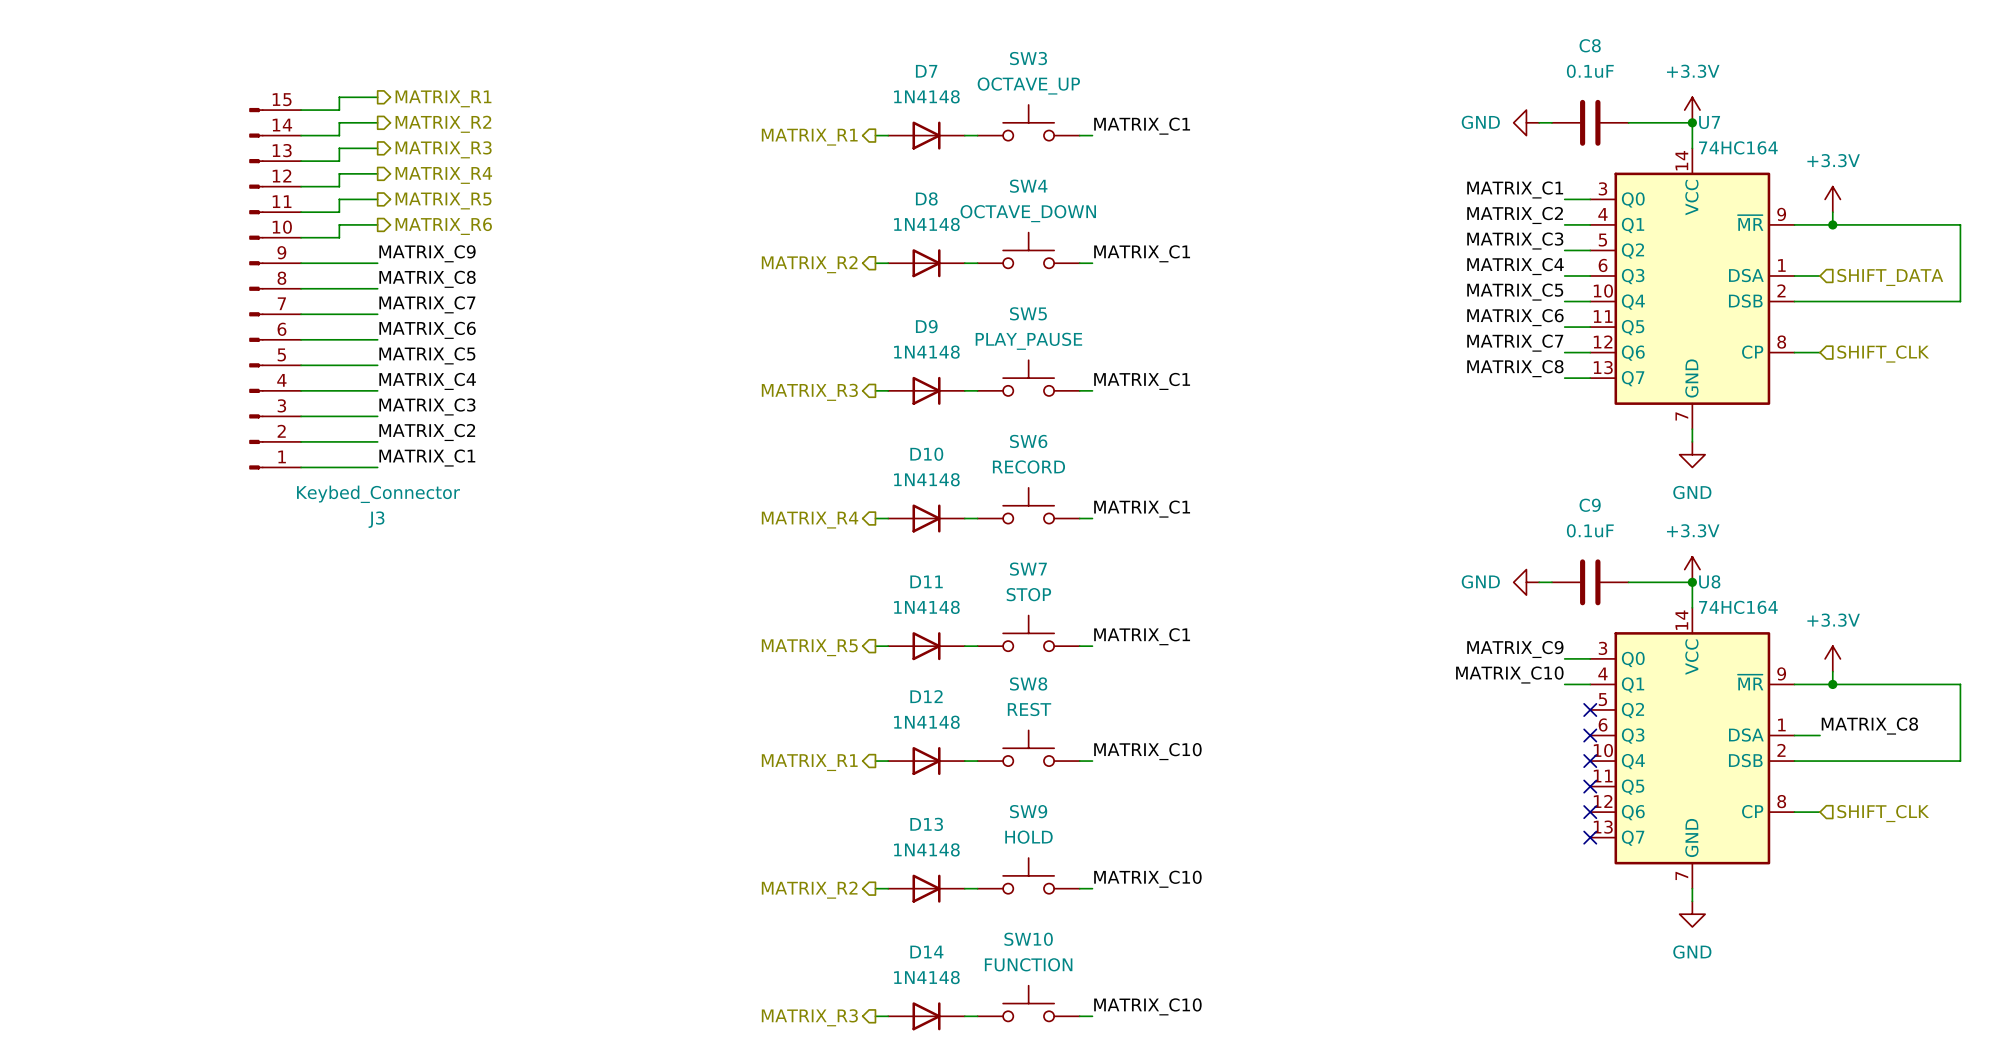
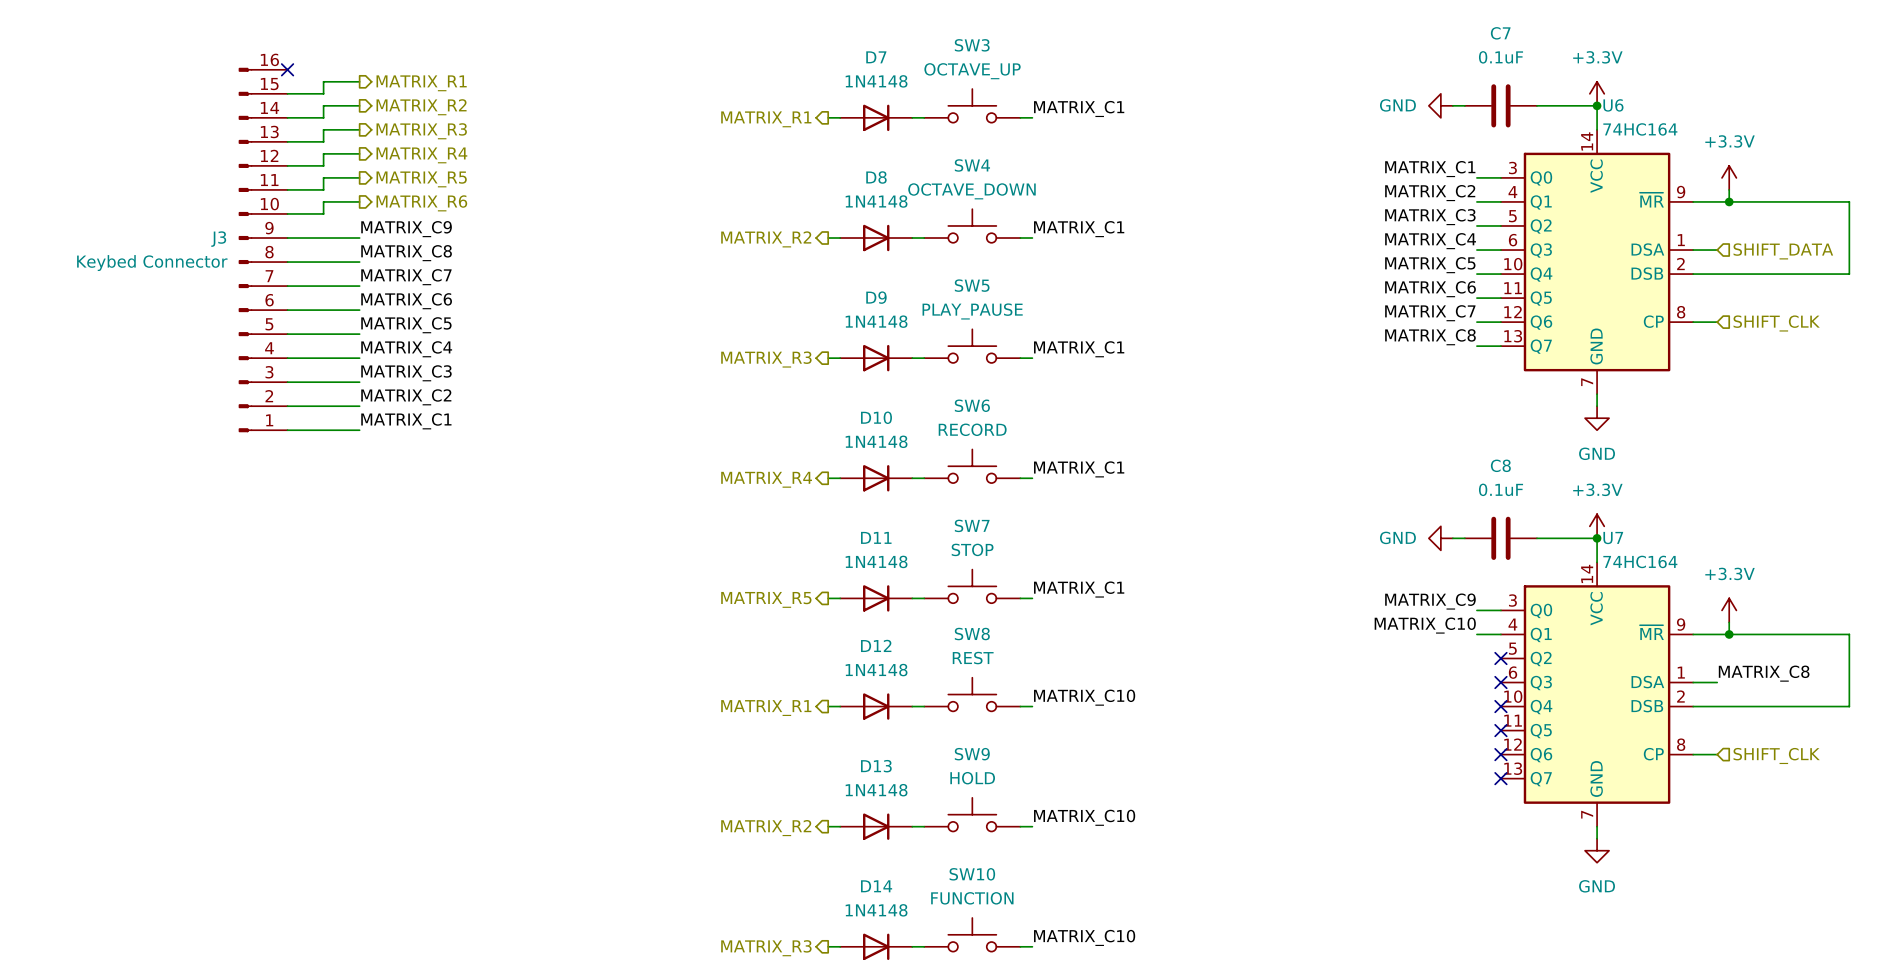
C8 name: C8 (1590, 45) -> C7 (1500, 33)
no-connect mark: none -> (287, 69)
J3 symbol: [249, 108, 302, 470] -> [238, 67, 288, 433]
U7 name: U7 (1709, 122) -> U6 (1613, 105)
J3 value: Keybed_Connector (378, 494) -> Keybed Connector (152, 263)
C9 name: C9 (1590, 505) -> C8 (1500, 465)
J3 name position: J3 (376, 519) -> J3 (218, 239)
U8 name: U8 (1709, 581) -> U7 (1613, 538)

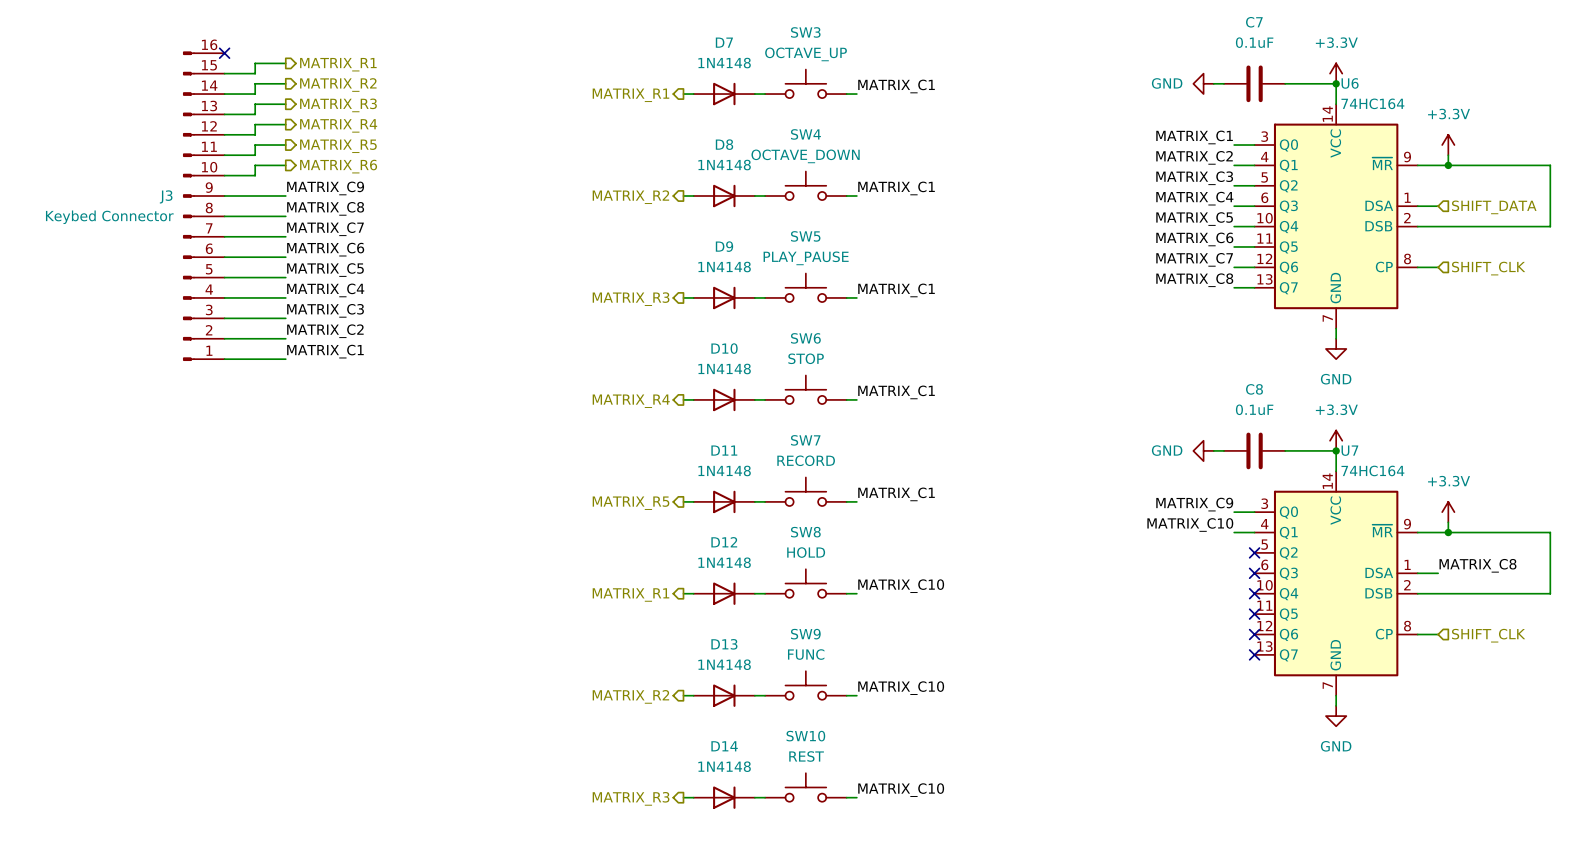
SW6 value: RECORD (972, 429) -> STOP (806, 358)
SW7 value: STOP (972, 549) -> RECORD (806, 460)
SW8 value: REST (973, 658) -> HOLD (806, 552)
SW9 value: HOLD (972, 778) -> FUNC (806, 654)
SW10 value: FUNCTION (972, 898) -> REST (806, 756)

